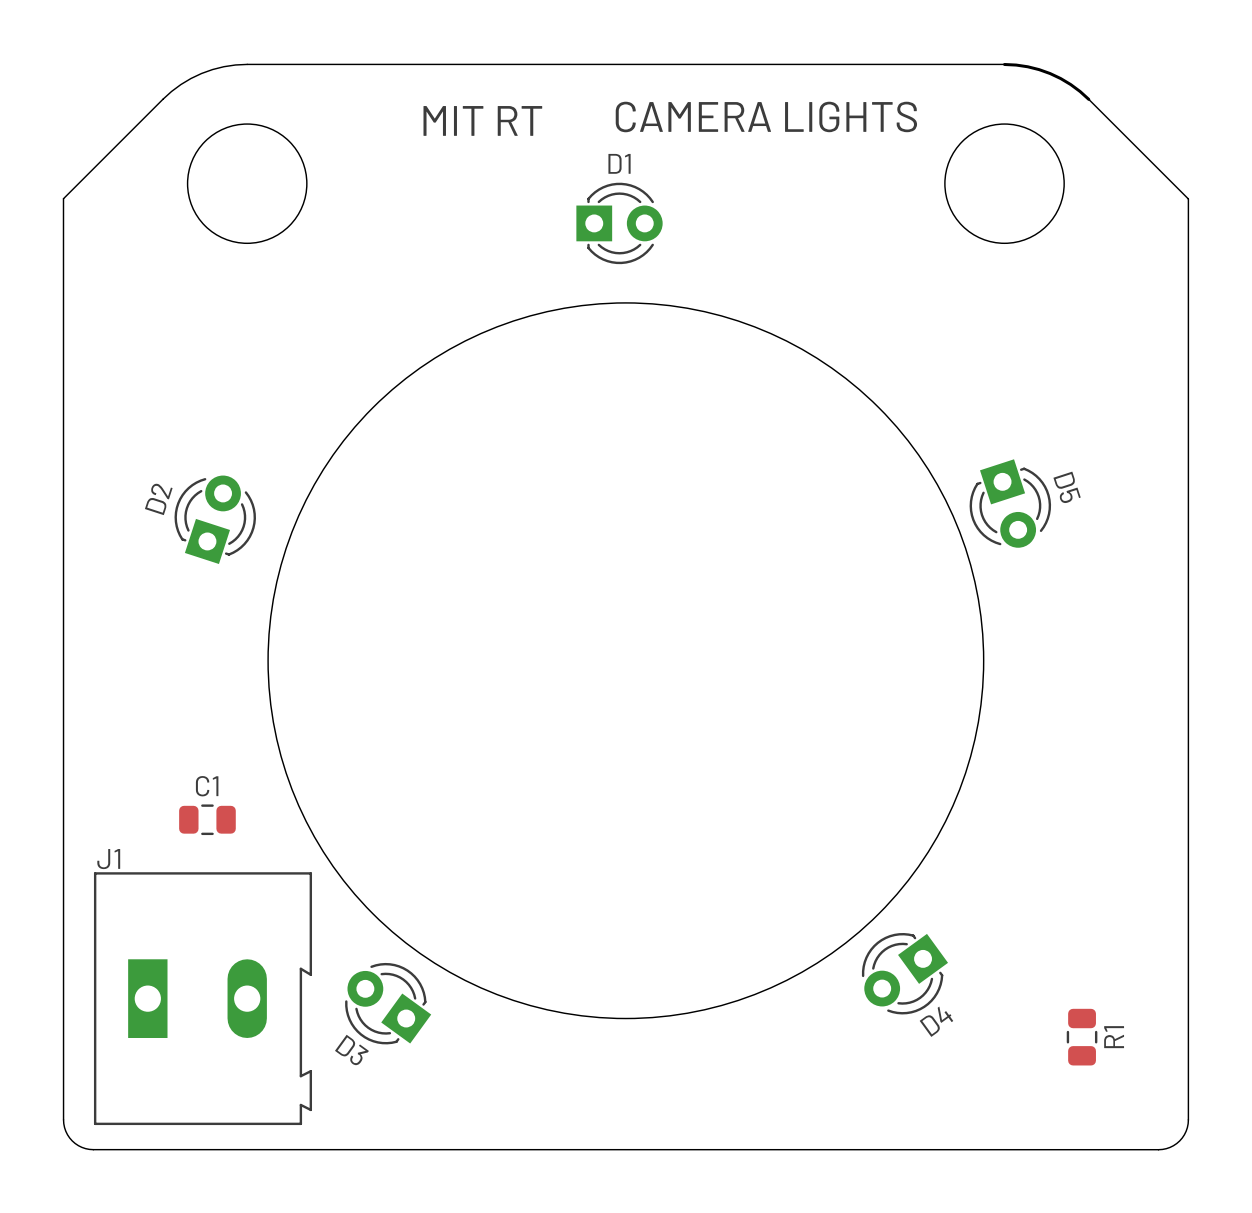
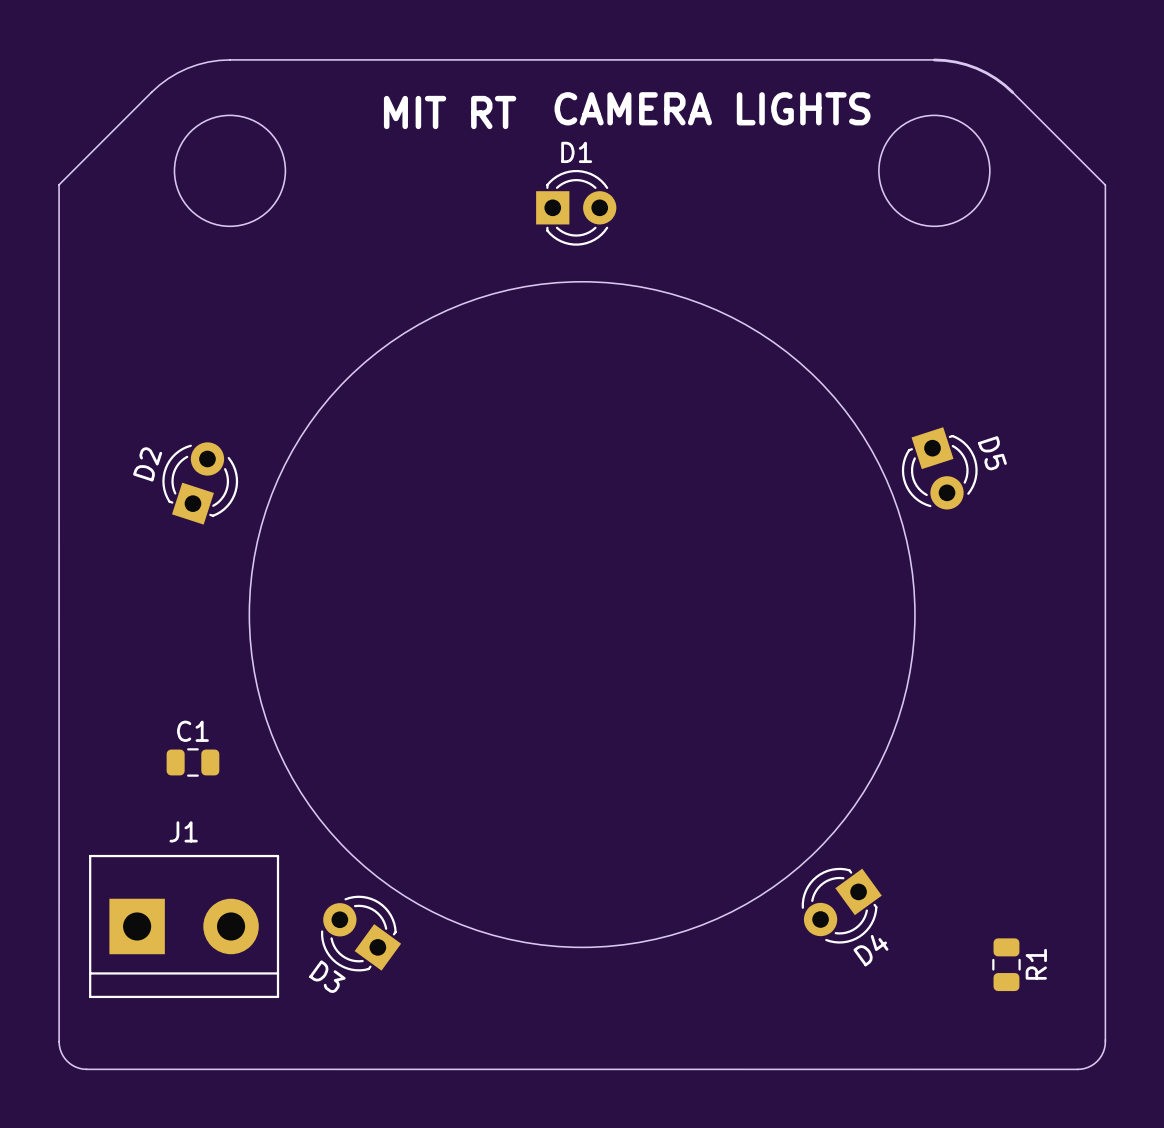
J1 name position: J1 (108, 859) -> J1 (183, 831)
J1 footprint: [93, 872, 313, 1126] -> [89, 854, 280, 999]

